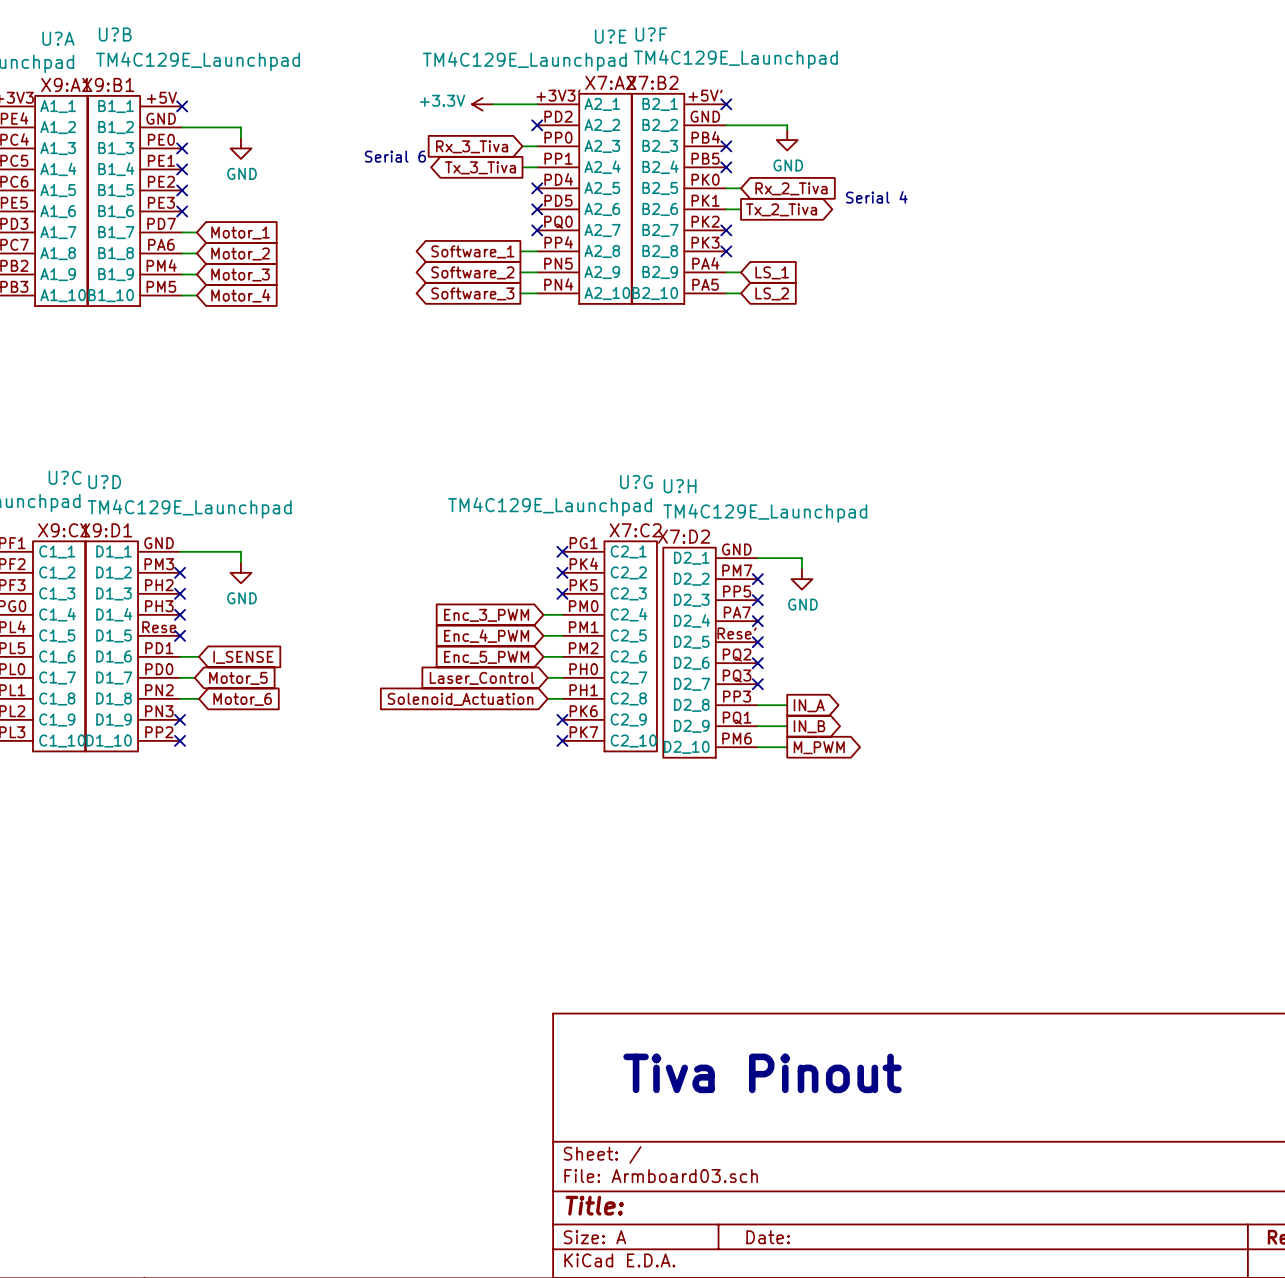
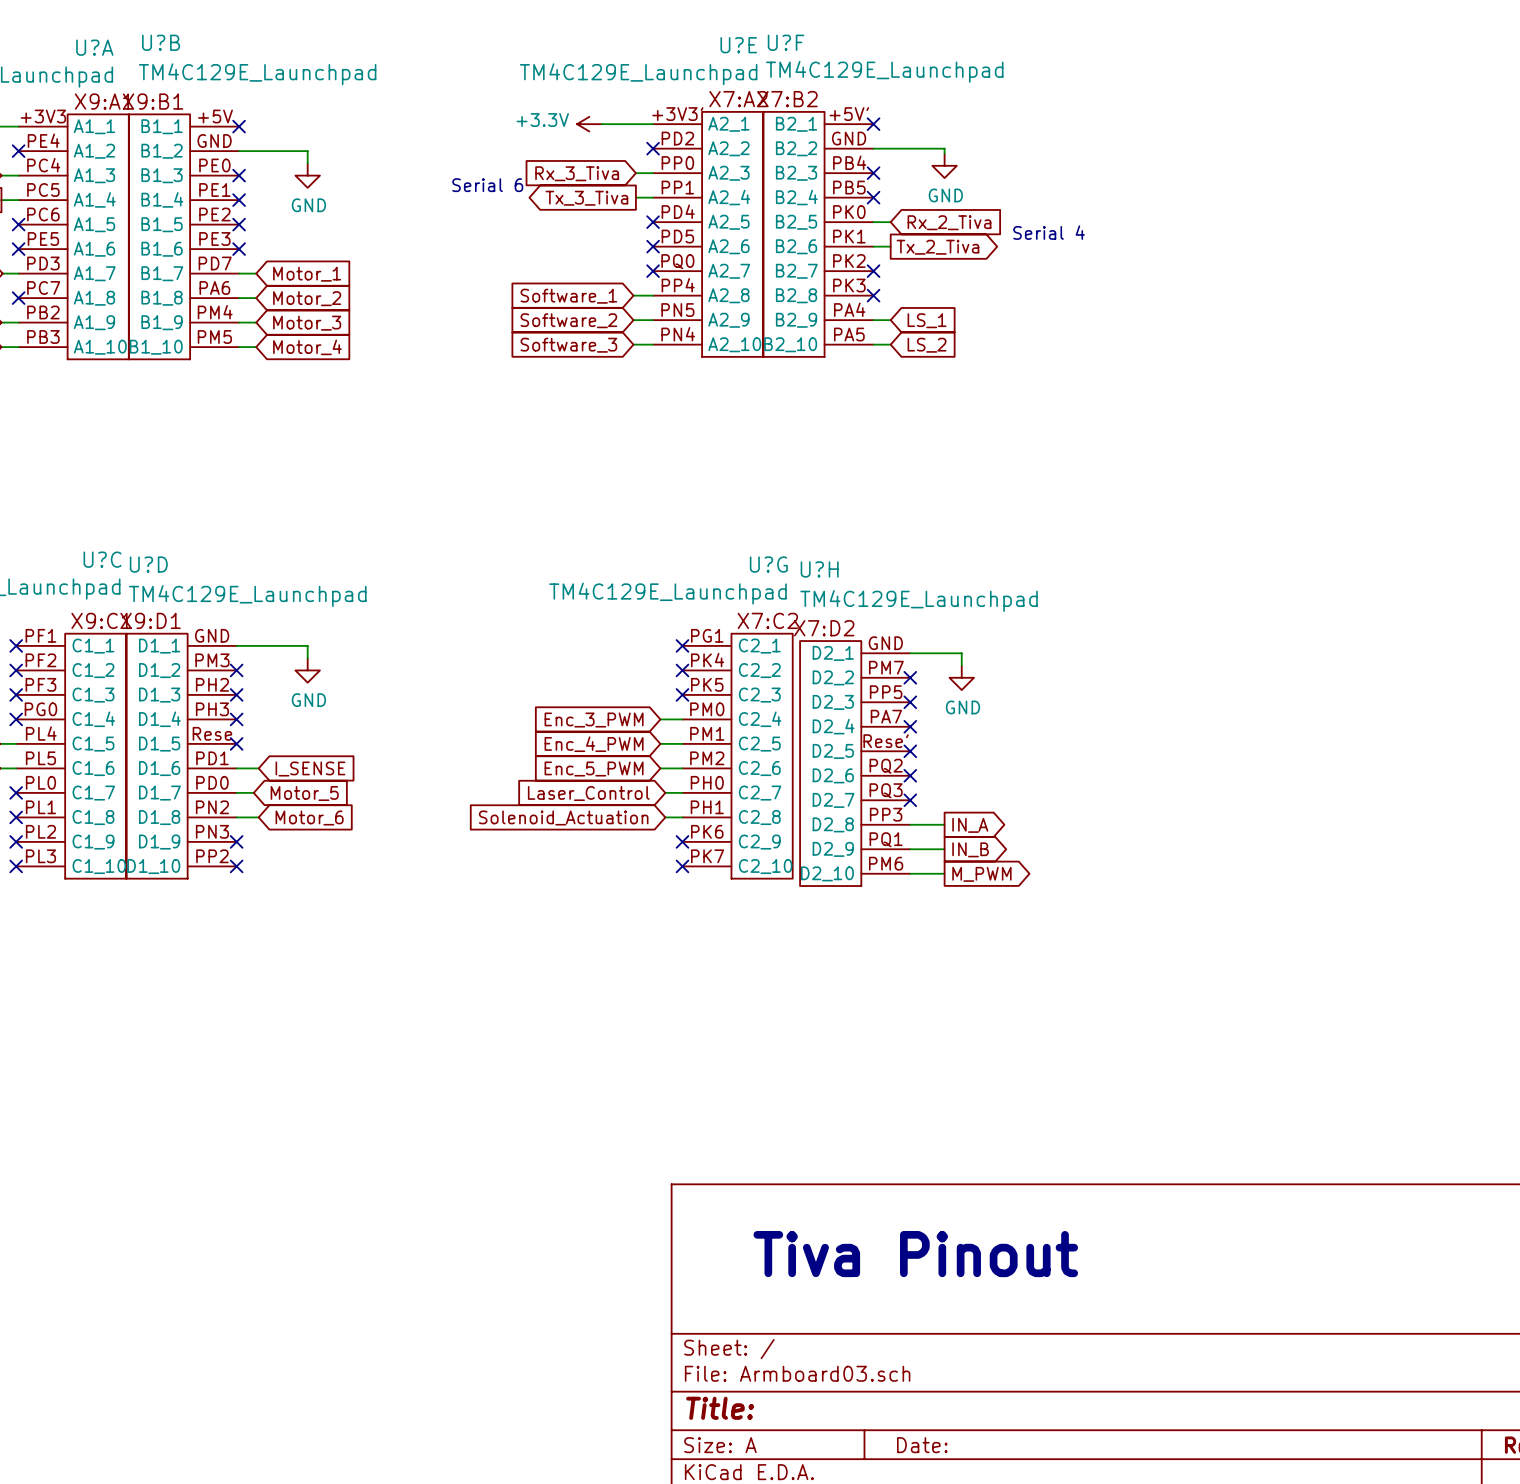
global label shape: output (472, 251) -> input (568, 296)
global label shape: output (472, 272) -> input (568, 320)
global label shape: output (472, 293) -> input (568, 345)

